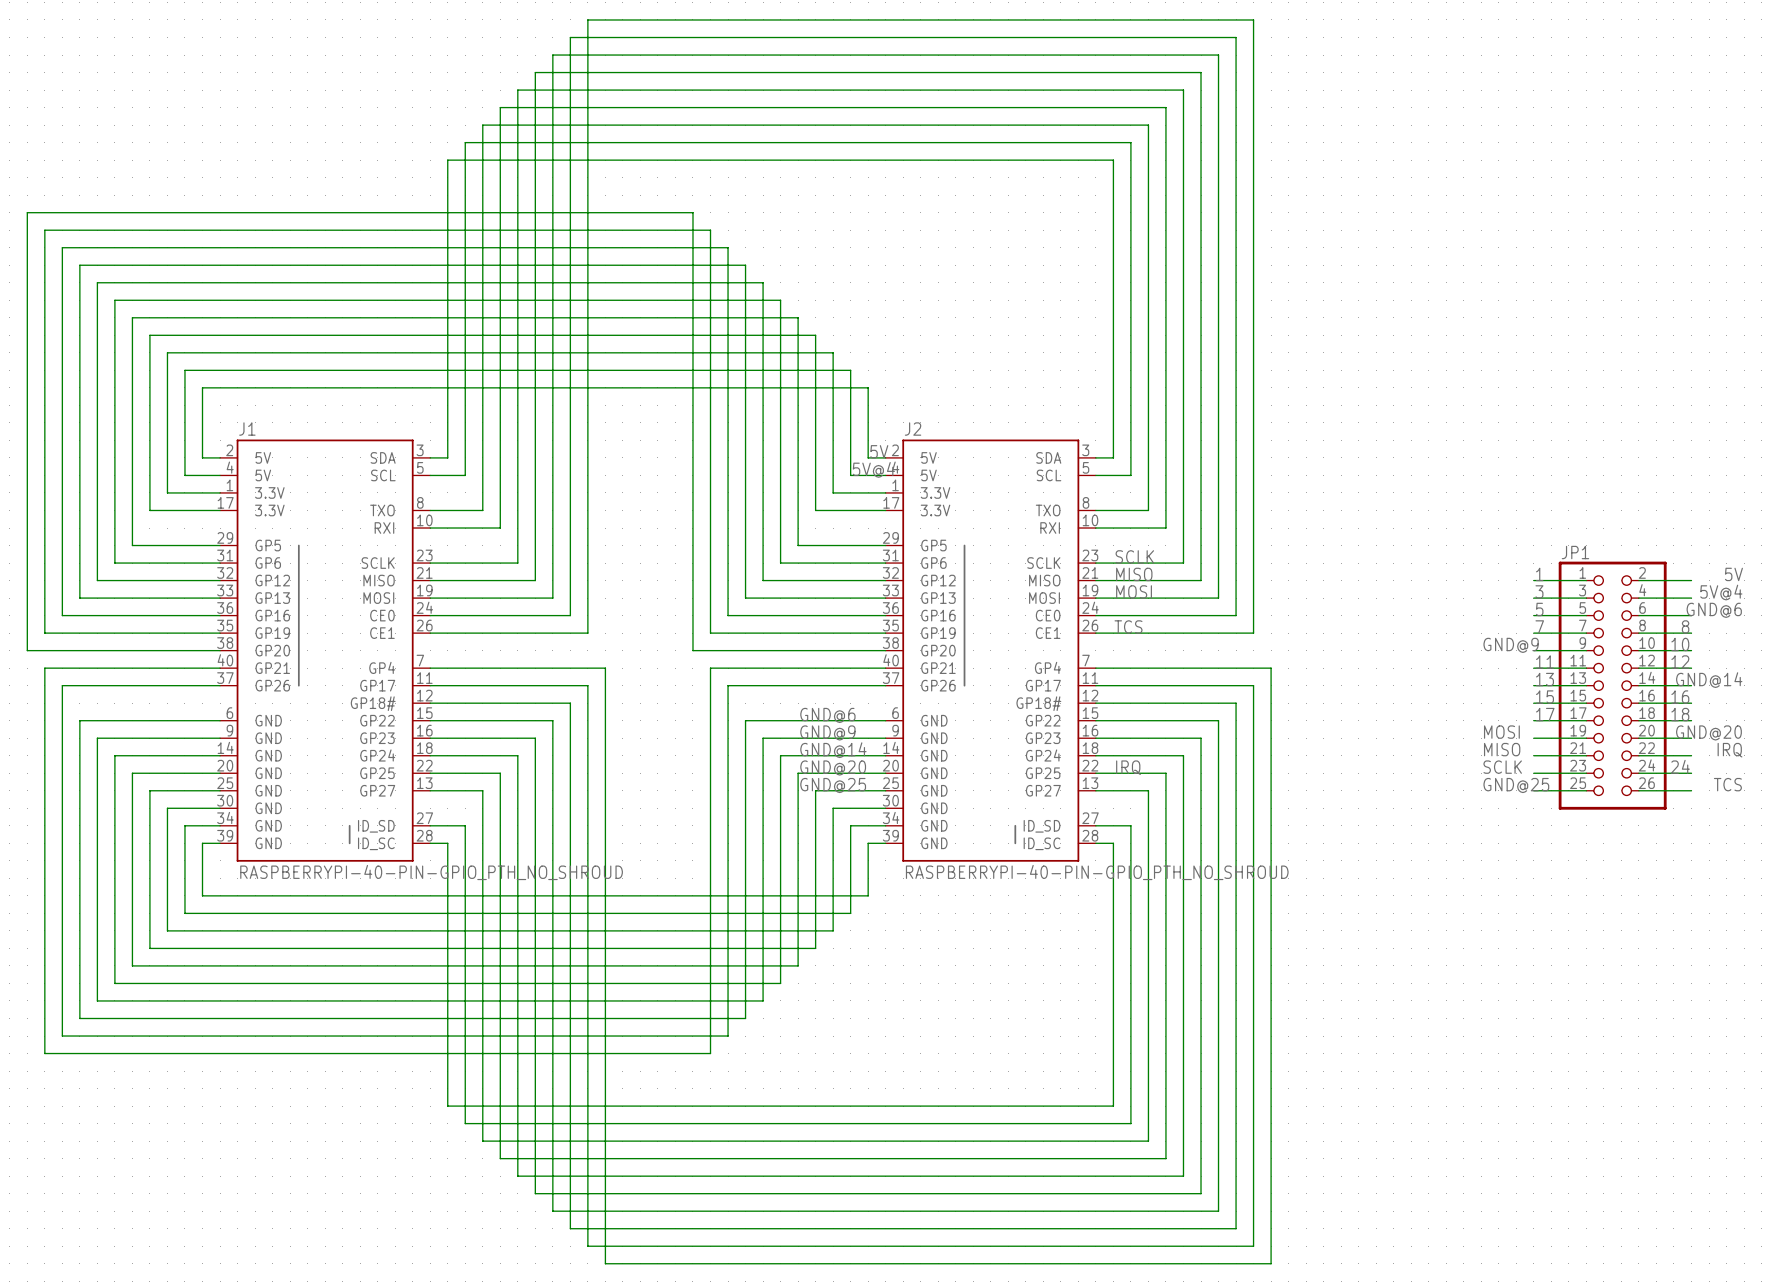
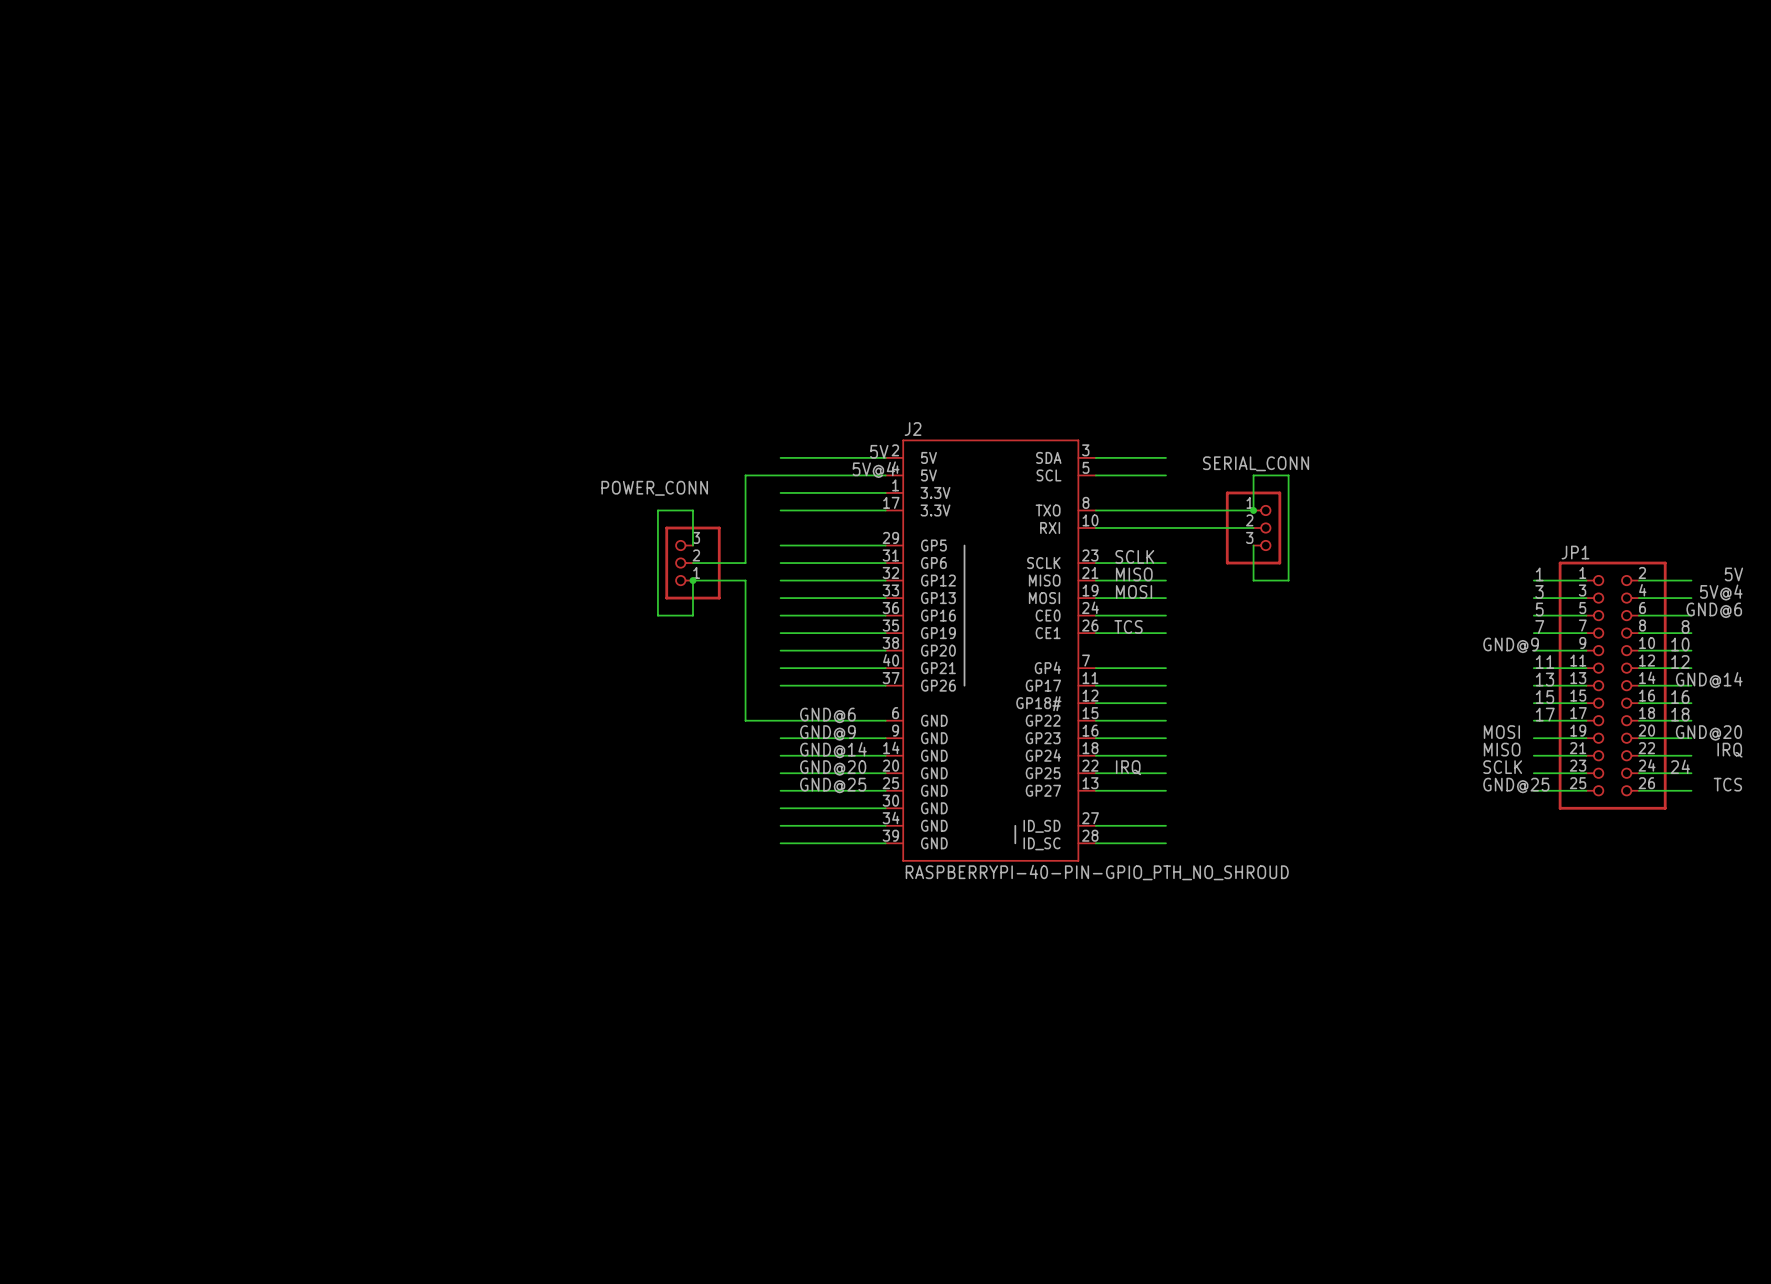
wire: (220, 457) (202, 457) (202, 387) (868, 387) (868, 457) -> (780, 457) (868, 457)
wire: (430, 457) (447, 457) (447, 160) (1113, 160) (1113, 457) -> (1165, 457) (1113, 457)
wire: (220, 475) (184, 475) (184, 370) (850, 370) (850, 475) -> (745, 475) (850, 475)
wire: (430, 475) (465, 475) (465, 142) (1130, 142) (1130, 475) -> (1165, 475) (1130, 475)
wire: (745, 475) (745, 265) (79, 265) (79, 598) (220, 598) -> none
wire: (1253, 475) (1253, 19) (587, 19) (587, 633) (430, 633) -> none
wire: (220, 492) (167, 492) (167, 352) (833, 352) (833, 492) -> (780, 492) (833, 492)
wire: (220, 510) (149, 510) (149, 335) (815, 335) (815, 510) -> (780, 510) (815, 510)
wire: (430, 510) (482, 510) (482, 125) (1148, 125) (1148, 510) -> none
wire: (692, 510) (692, 212) (27, 212) (27, 650) (220, 650) -> none
wire: (1253, 510) (1253, 545) -> (1253, 510) (1148, 510)
junction: none -> (1253, 510)
wire: (430, 528) (500, 528) (500, 107) (1165, 107) (1165, 528) -> (1253, 528) (1165, 528)
SERIAL_CONN: none -> (1253, 528)
wire: (220, 545) (132, 545) (132, 317) (798, 317) (798, 545) -> (780, 545) (798, 545)
wire: (692, 545) (692, 580) -> (745, 580) (692, 580)
wire: (220, 563) (114, 563) (114, 300) (780, 300) (780, 563) -> none
wire: (430, 563) (517, 563) (517, 90) (1183, 90) (1183, 563) (1165, 563) -> none
POWER_CONN: none -> (692, 563)
wire: (745, 563) (745, 580) -> (745, 563) (692, 563)
wire: (220, 580) (97, 580) (97, 282) (763, 282) (763, 580) (780, 580) -> none
wire: (430, 580) (535, 580) (535, 72) (1201, 72) (1201, 580) (1165, 580) -> none
junction: none -> (692, 580)
wire: (1253, 580) (1253, 633) (1165, 633) -> (1253, 580) (1288, 580) (1288, 475) (1253, 475)
wire: (430, 598) (552, 598) (552, 55) (1218, 55) (1218, 598) (1165, 598) -> none
wire: (745, 598) (780, 598) -> (745, 598) (745, 720)
wire: (220, 615) (62, 615) (62, 247) (728, 247) (728, 615) (780, 615) -> none
wire: (430, 615) (570, 615) (570, 37) (1236, 37) (1236, 615) (1165, 615) -> none
wire: (692, 615) (692, 650) (780, 650) -> (692, 615) (657, 615) (657, 510) (692, 510)
wire: (220, 633) (44, 633) (44, 230) (710, 230) (710, 633) (780, 633) -> none
J1: RASPBERRYPI-40-PIN-GPIO_PTH_NO_SHROUD (325, 650) -> none
wire: (220, 668) (44, 668) (44, 1053) (710, 1053) (710, 668) (780, 668) -> none
wire: (430, 668) (605, 668) (605, 1263) (1271, 1263) (1271, 668) (1165, 668) -> none
wire: (220, 685) (62, 685) (62, 1036) (728, 1036) (728, 685) (780, 685) -> none
wire: (430, 685) (587, 685) (587, 1246) (1253, 1246) (1253, 685) (1165, 685) -> none
wire: (430, 703) (570, 703) (570, 1228) (1236, 1228) (1236, 703) (1165, 703) -> none
wire: (220, 720) (79, 720) (79, 1018) (745, 1018) (745, 720) -> none
wire: (430, 720) (552, 720) (552, 1211) (1218, 1211) (1218, 720) (1165, 720) -> none
wire: (220, 738) (97, 738) (97, 1000) (763, 1000) (763, 738) (780, 738) -> none
wire: (430, 738) (535, 738) (535, 1193) (1201, 1193) (1201, 738) (1165, 738) -> none
wire: (220, 755) (114, 755) (114, 983) (780, 983) (780, 755) -> none
wire: (430, 755) (517, 755) (517, 1176) (1183, 1176) (1183, 755) (1165, 755) -> none
wire: (220, 773) (132, 773) (132, 965) (798, 965) (798, 773) -> (780, 773) (798, 773)
wire: (430, 773) (500, 773) (500, 1158) (1165, 1158) (1165, 773) -> none
wire: (220, 790) (149, 790) (149, 948) (815, 948) (815, 790) -> (780, 790) (815, 790)
wire: (430, 790) (482, 790) (482, 1141) (1148, 1141) (1148, 790) -> (1165, 790) (1148, 790)
wire: (220, 808) (167, 808) (167, 930) (833, 930) (833, 808) -> (780, 808) (833, 808)
wire: (220, 825) (184, 825) (184, 913) (850, 913) (850, 825) -> (780, 825) (850, 825)
wire: (430, 825) (465, 825) (465, 1123) (1130, 1123) (1130, 825) -> (1165, 825) (1130, 825)
wire: (220, 843) (202, 843) (202, 895) (868, 895) (868, 843) -> (780, 843) (868, 843)
wire: (430, 843) (447, 843) (447, 1106) (1113, 1106) (1113, 843) -> (1165, 843) (1113, 843)

